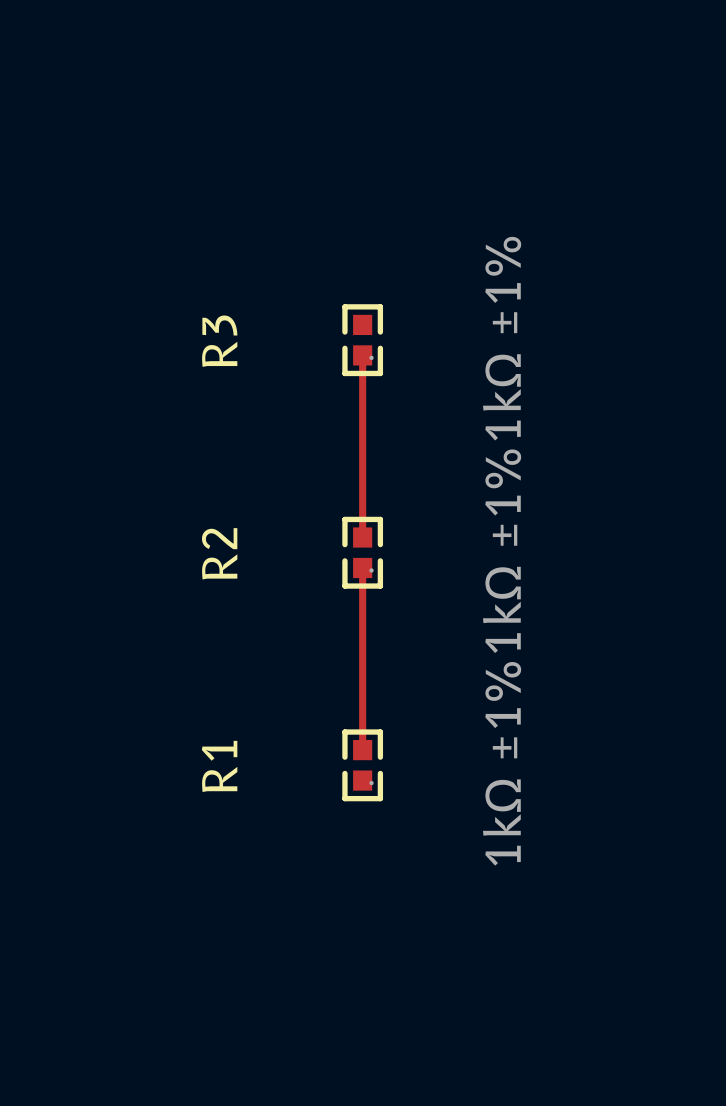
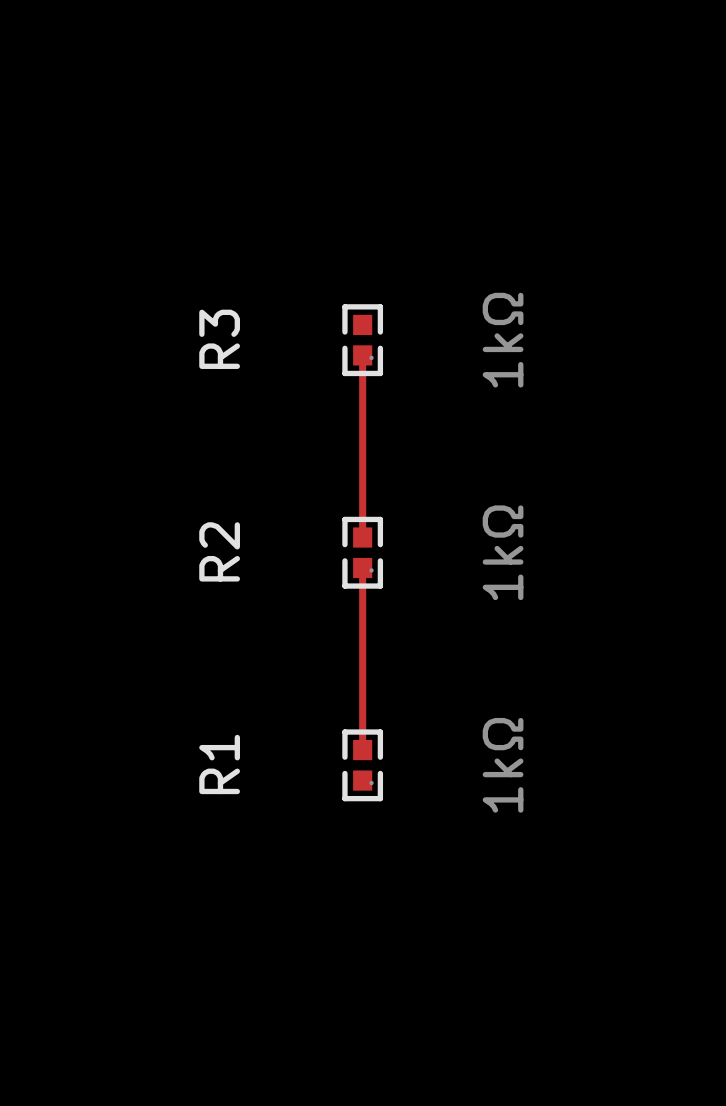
R3 value: 1kΩ ±1% (502, 338) -> 1kΩ (503, 340)
R2 value: 1kΩ ±1% (502, 551) -> 1kΩ (503, 552)
R1 value: 1kΩ ±1% (502, 763) -> 1kΩ (503, 765)

